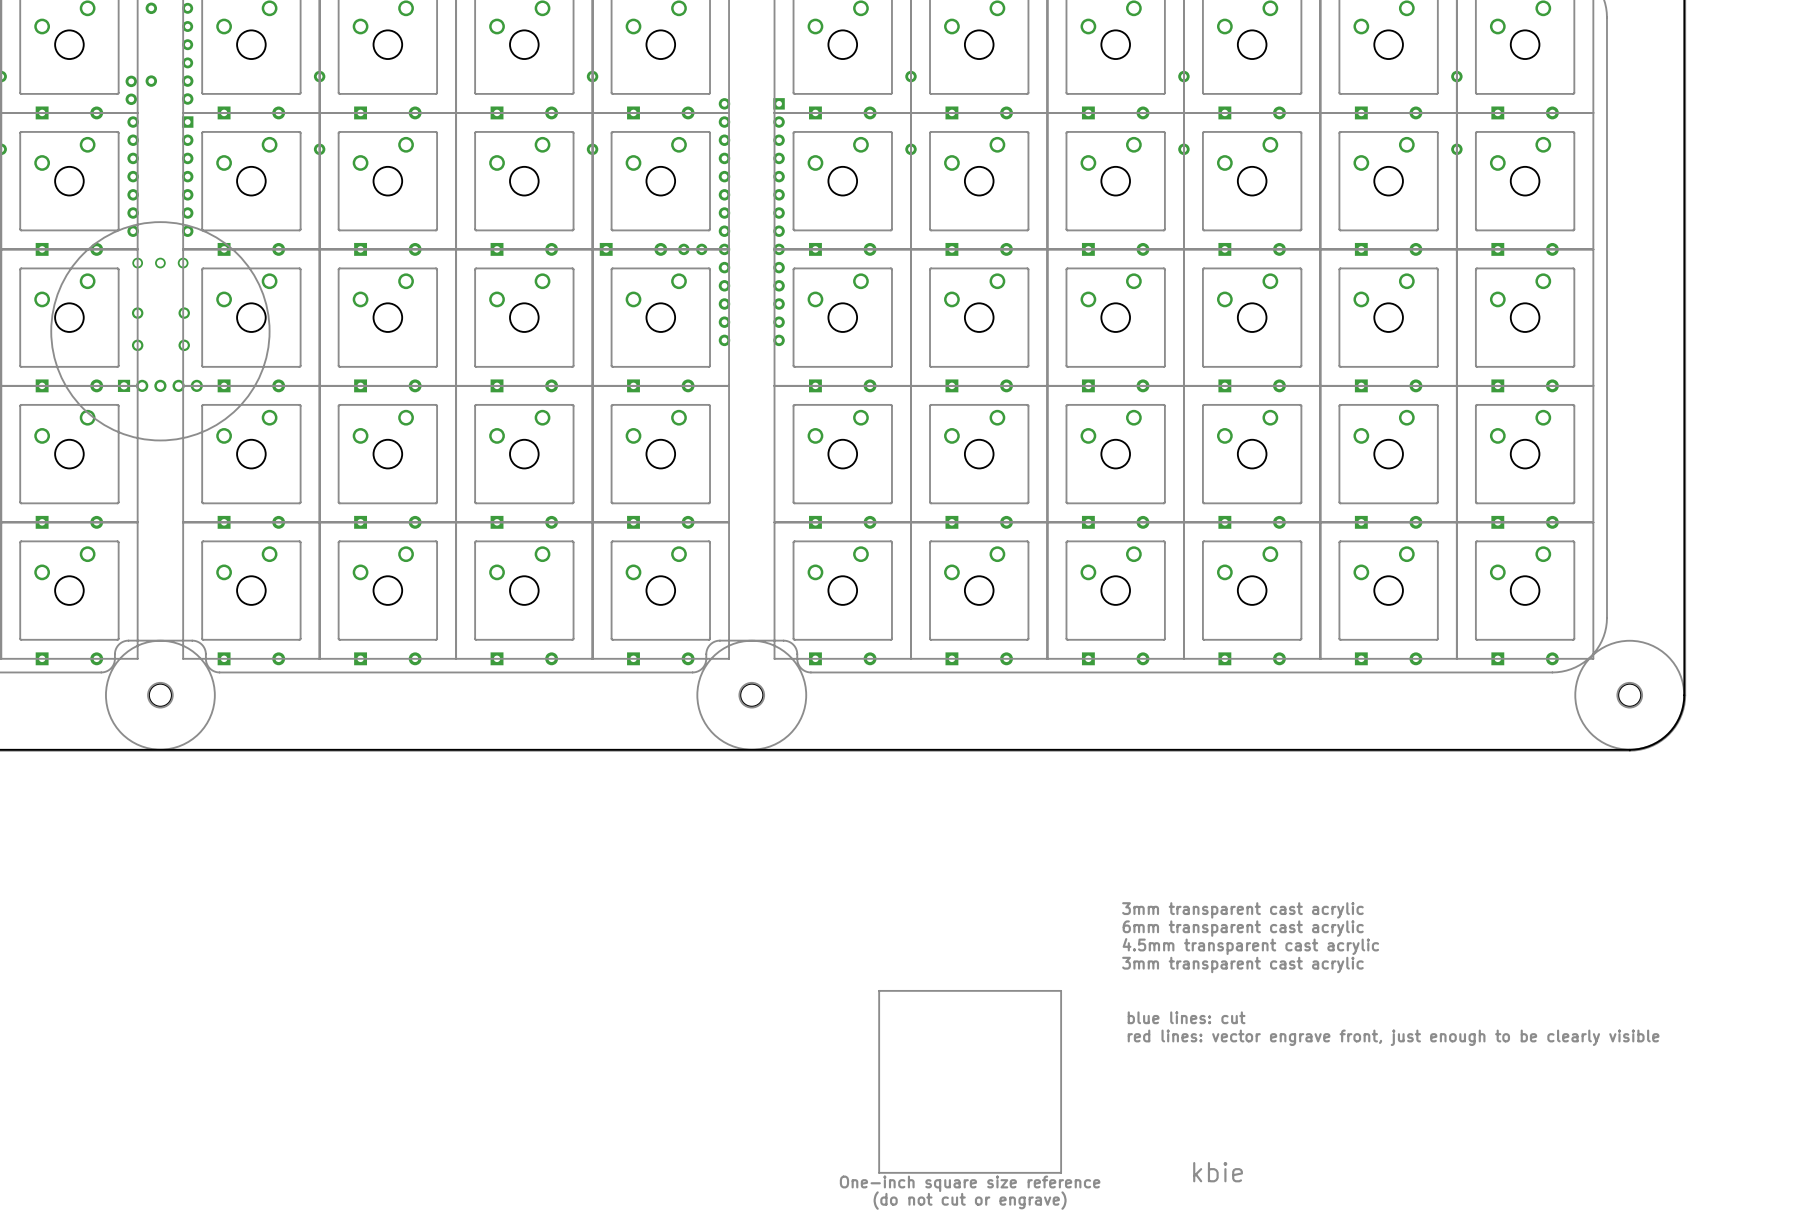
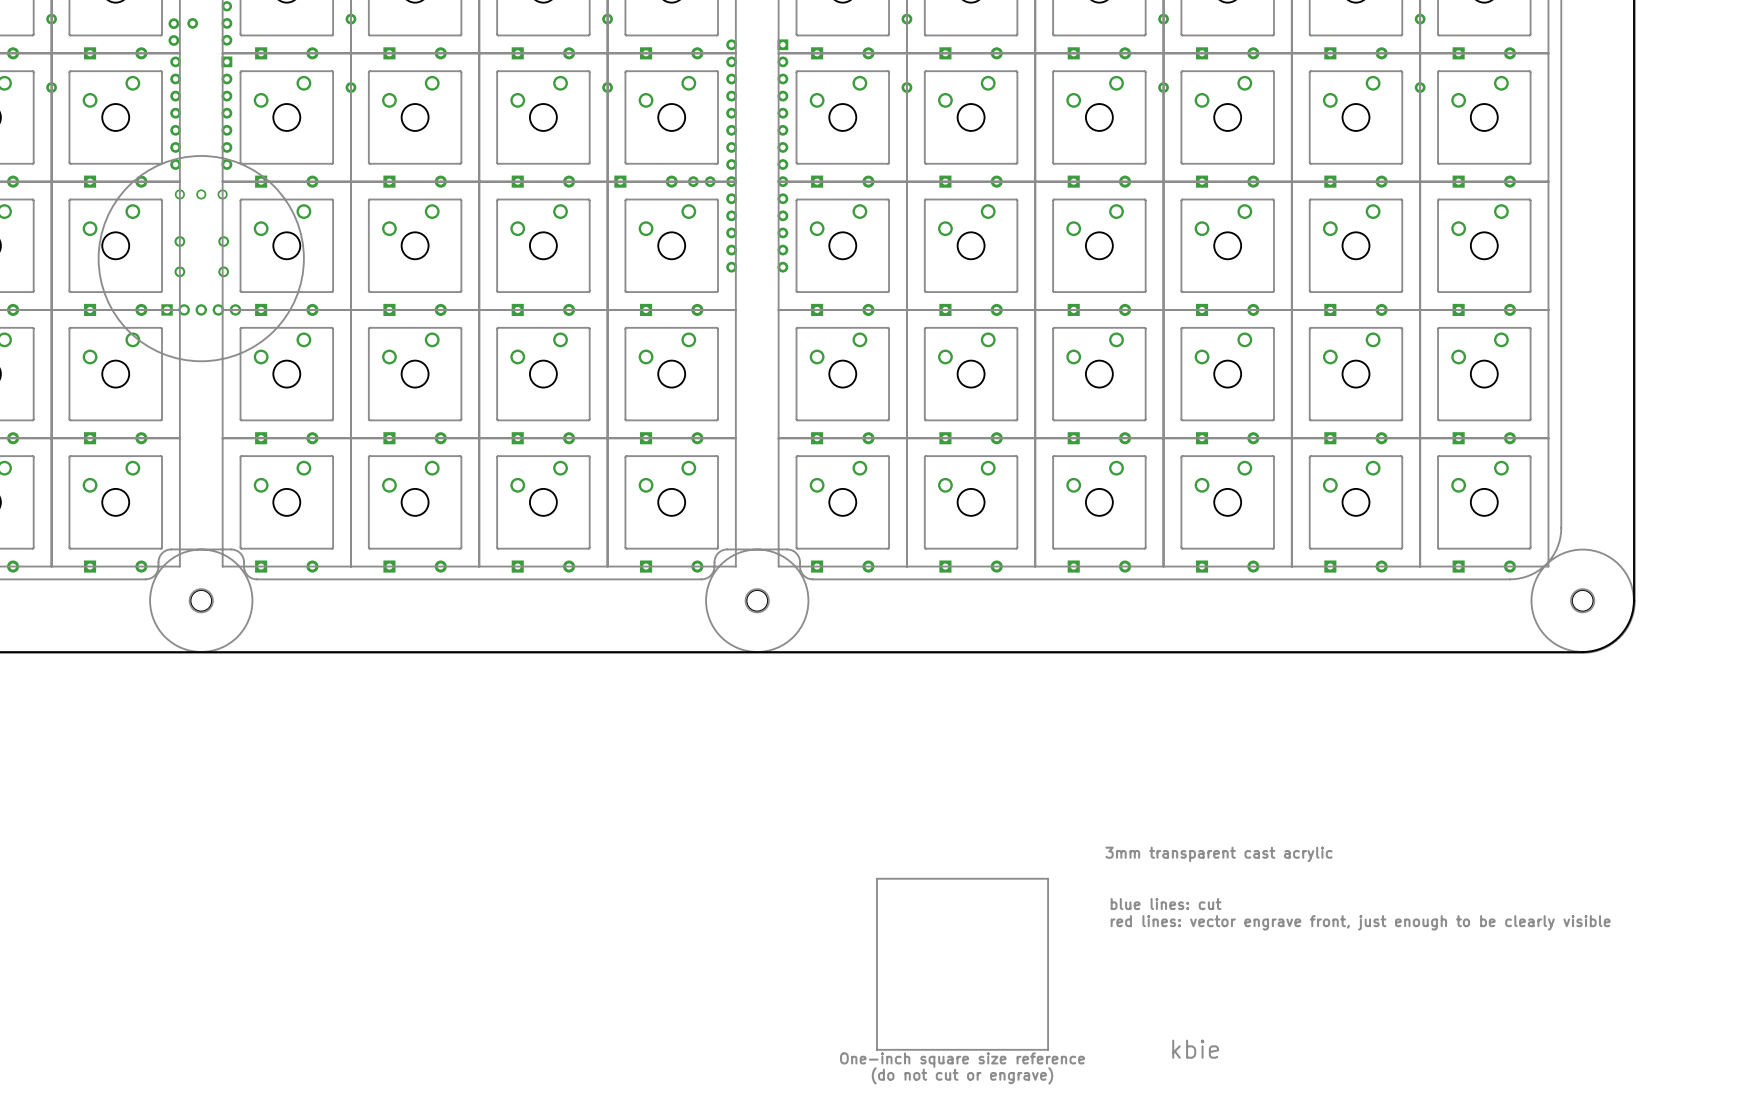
text: 3mm transparent cast acrylic (1242, 910) -> none
text: 6mm transparent cast acrylic (1243, 928) -> none
text: 4.5mm transparent cast acrylic (1250, 946) -> none

